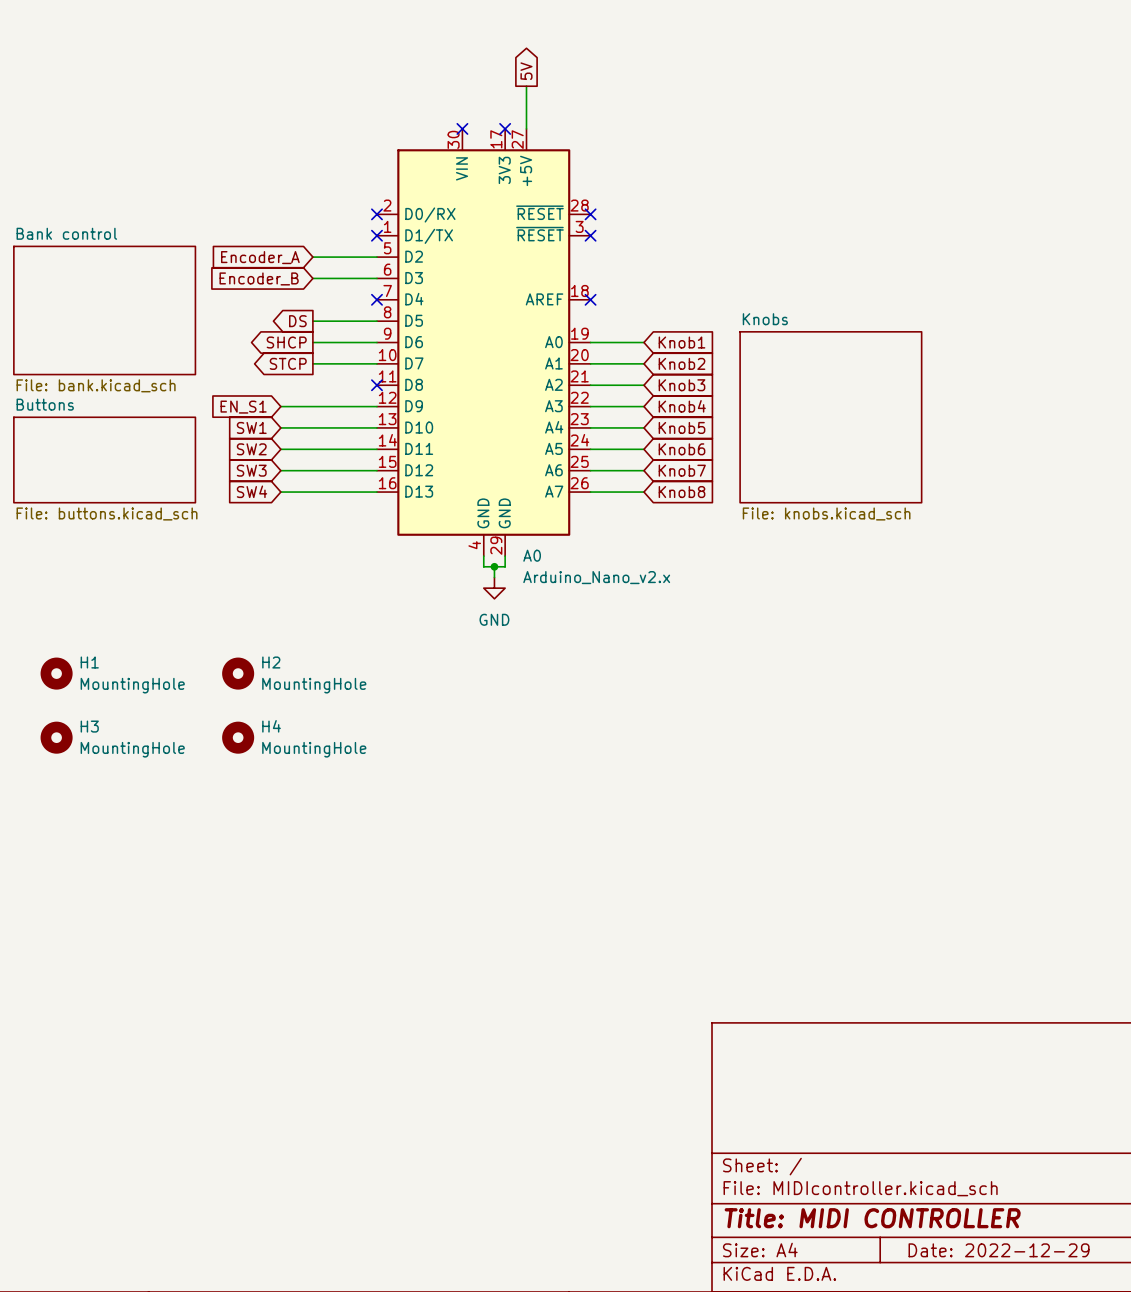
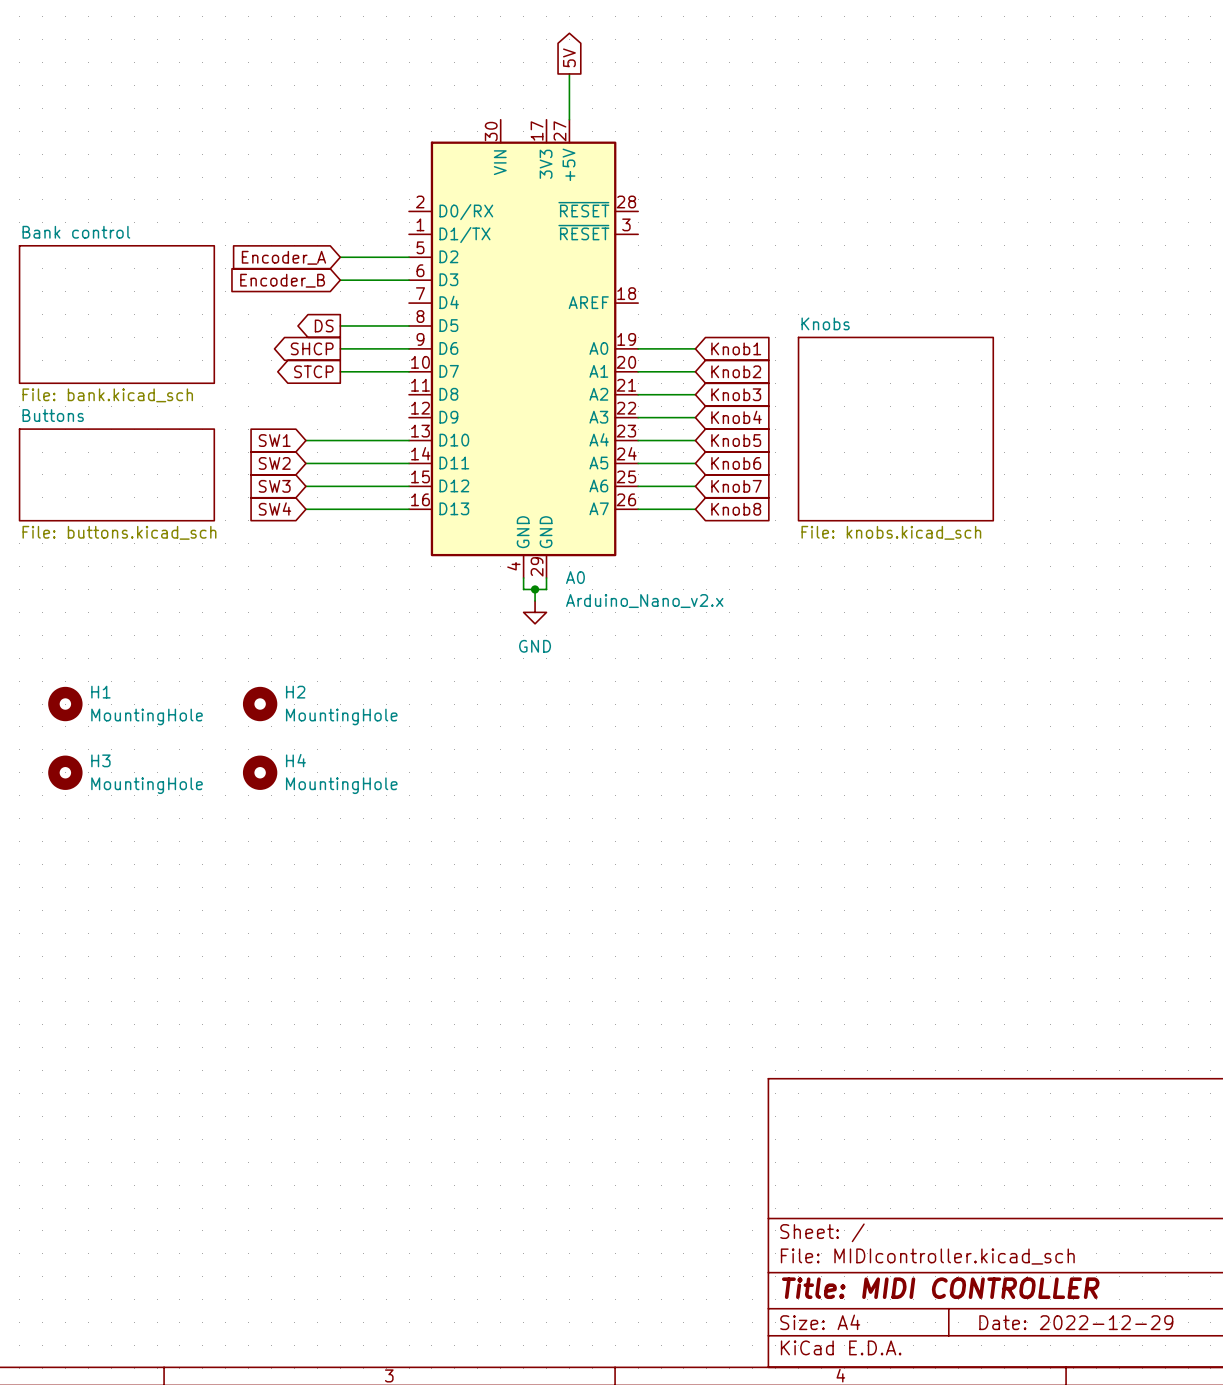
no-connect mark: (462, 128) -> none
no-connect mark: (505, 128) -> none
no-connect mark: (376, 214) -> none
no-connect mark: (590, 214) -> none
no-connect mark: (376, 235) -> none
no-connect mark: (590, 235) -> none
no-connect mark: (376, 299) -> none
no-connect mark: (590, 299) -> none
no-connect mark: (376, 385) -> none
wire: (280, 406) (376, 406) -> none
global label: EN_S1 (243, 407) -> none

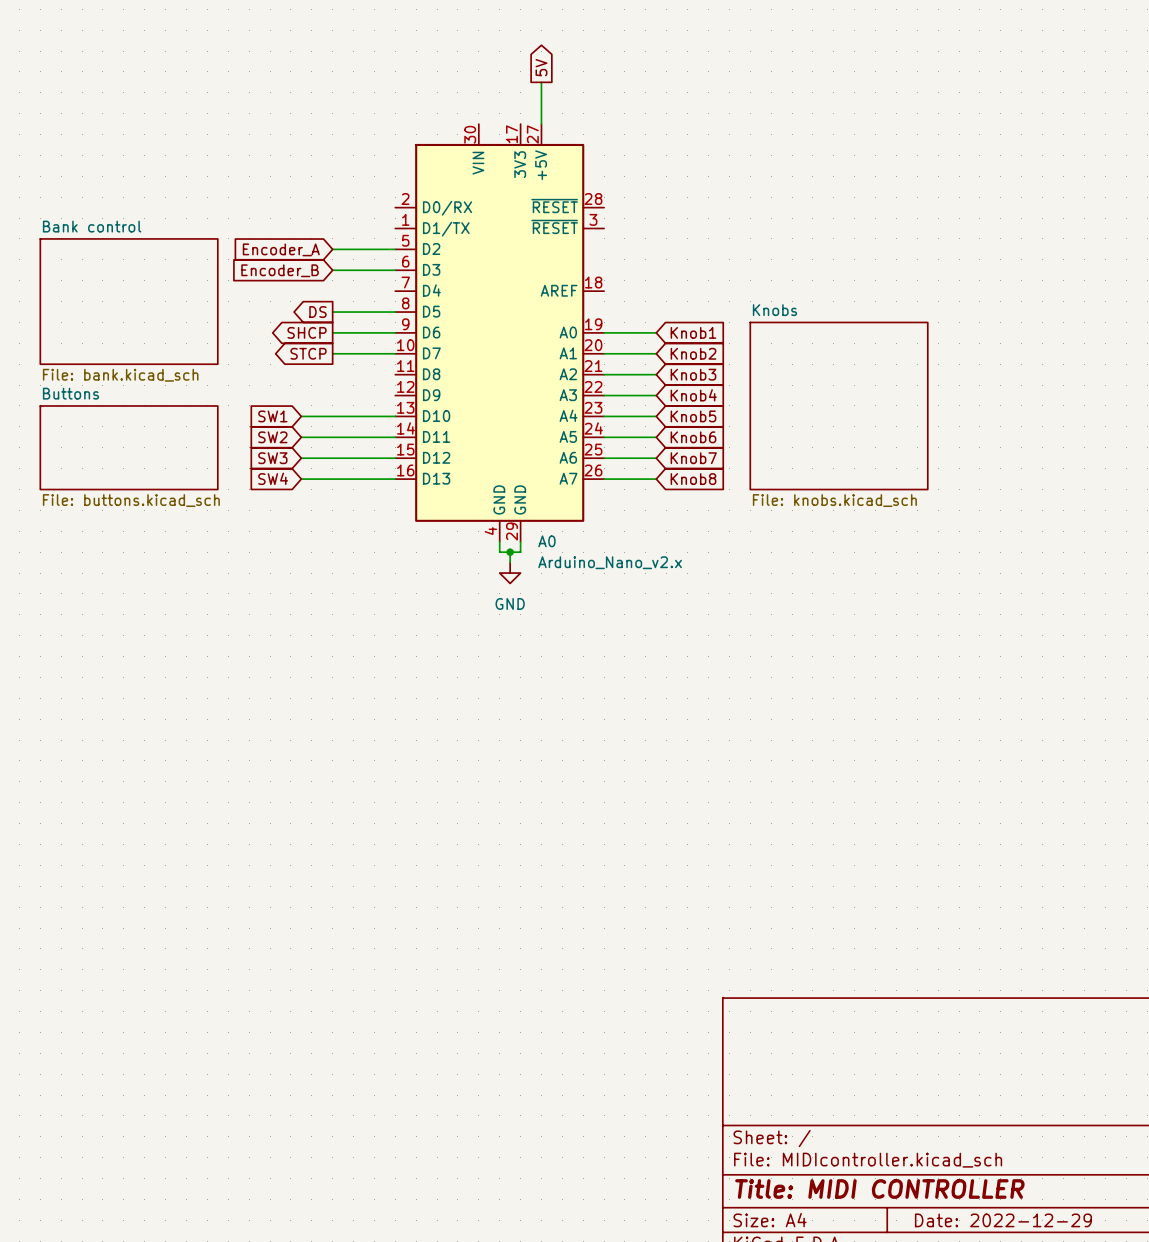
H1: MountingHole (65, 704) -> none
H2: MountingHole (260, 704) -> none
H3: MountingHole (65, 772) -> none
H4: MountingHole (260, 772) -> none

